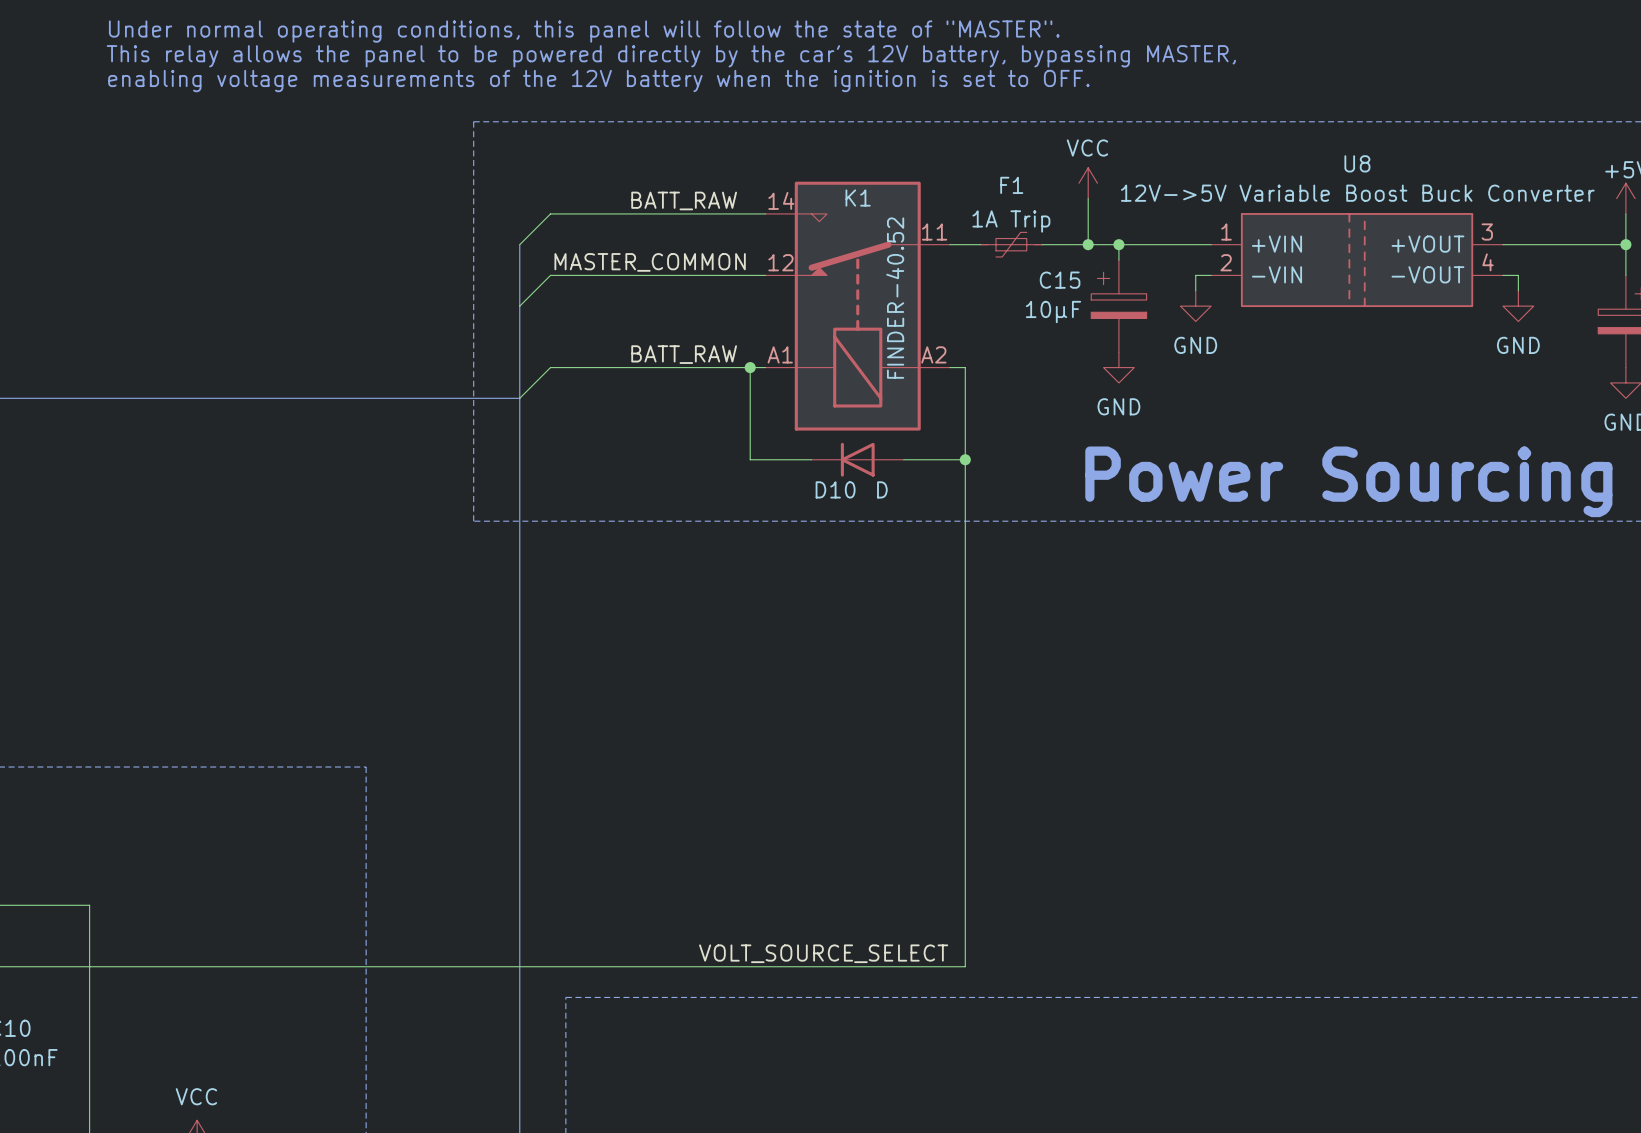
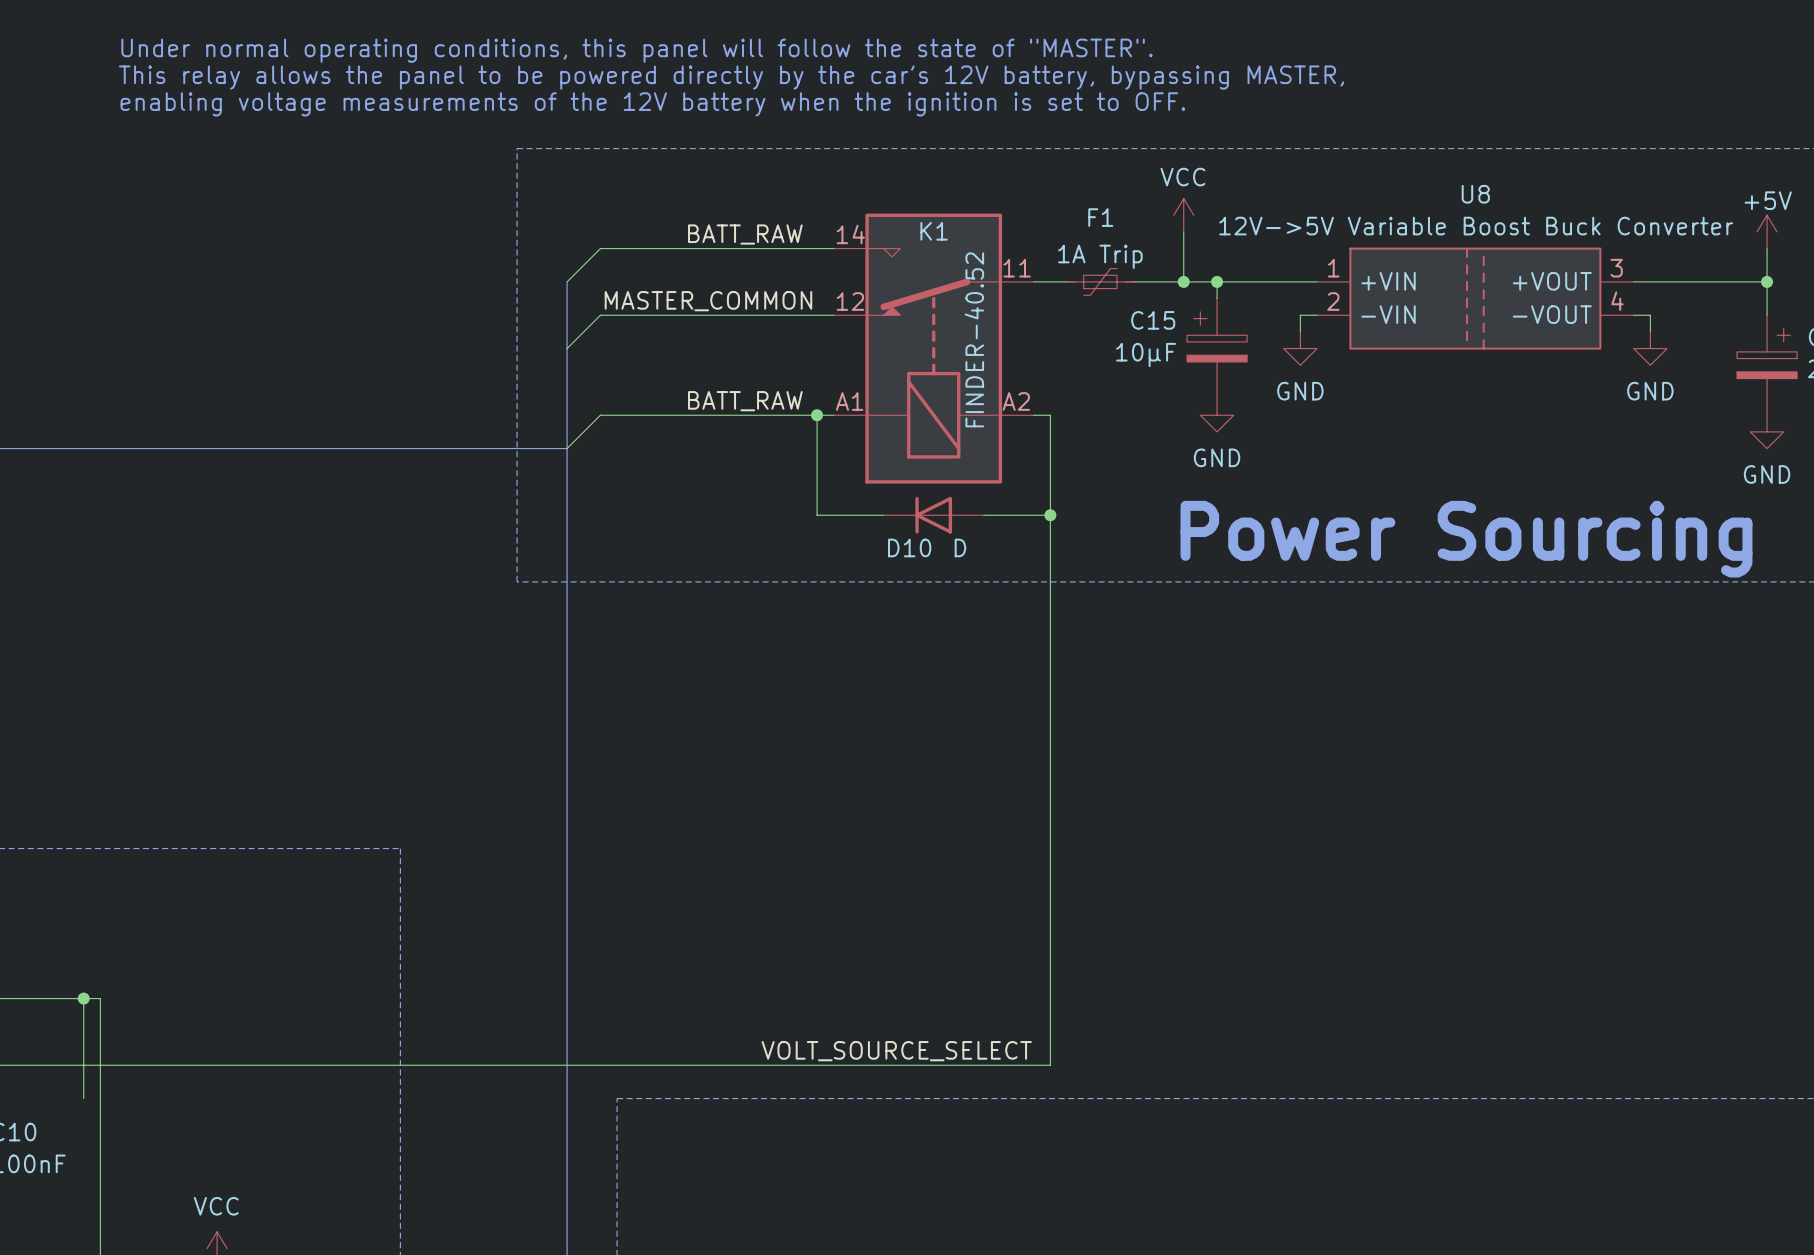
wire: none -> (83, 998) (83, 1098)
junction: none -> (83, 998)

